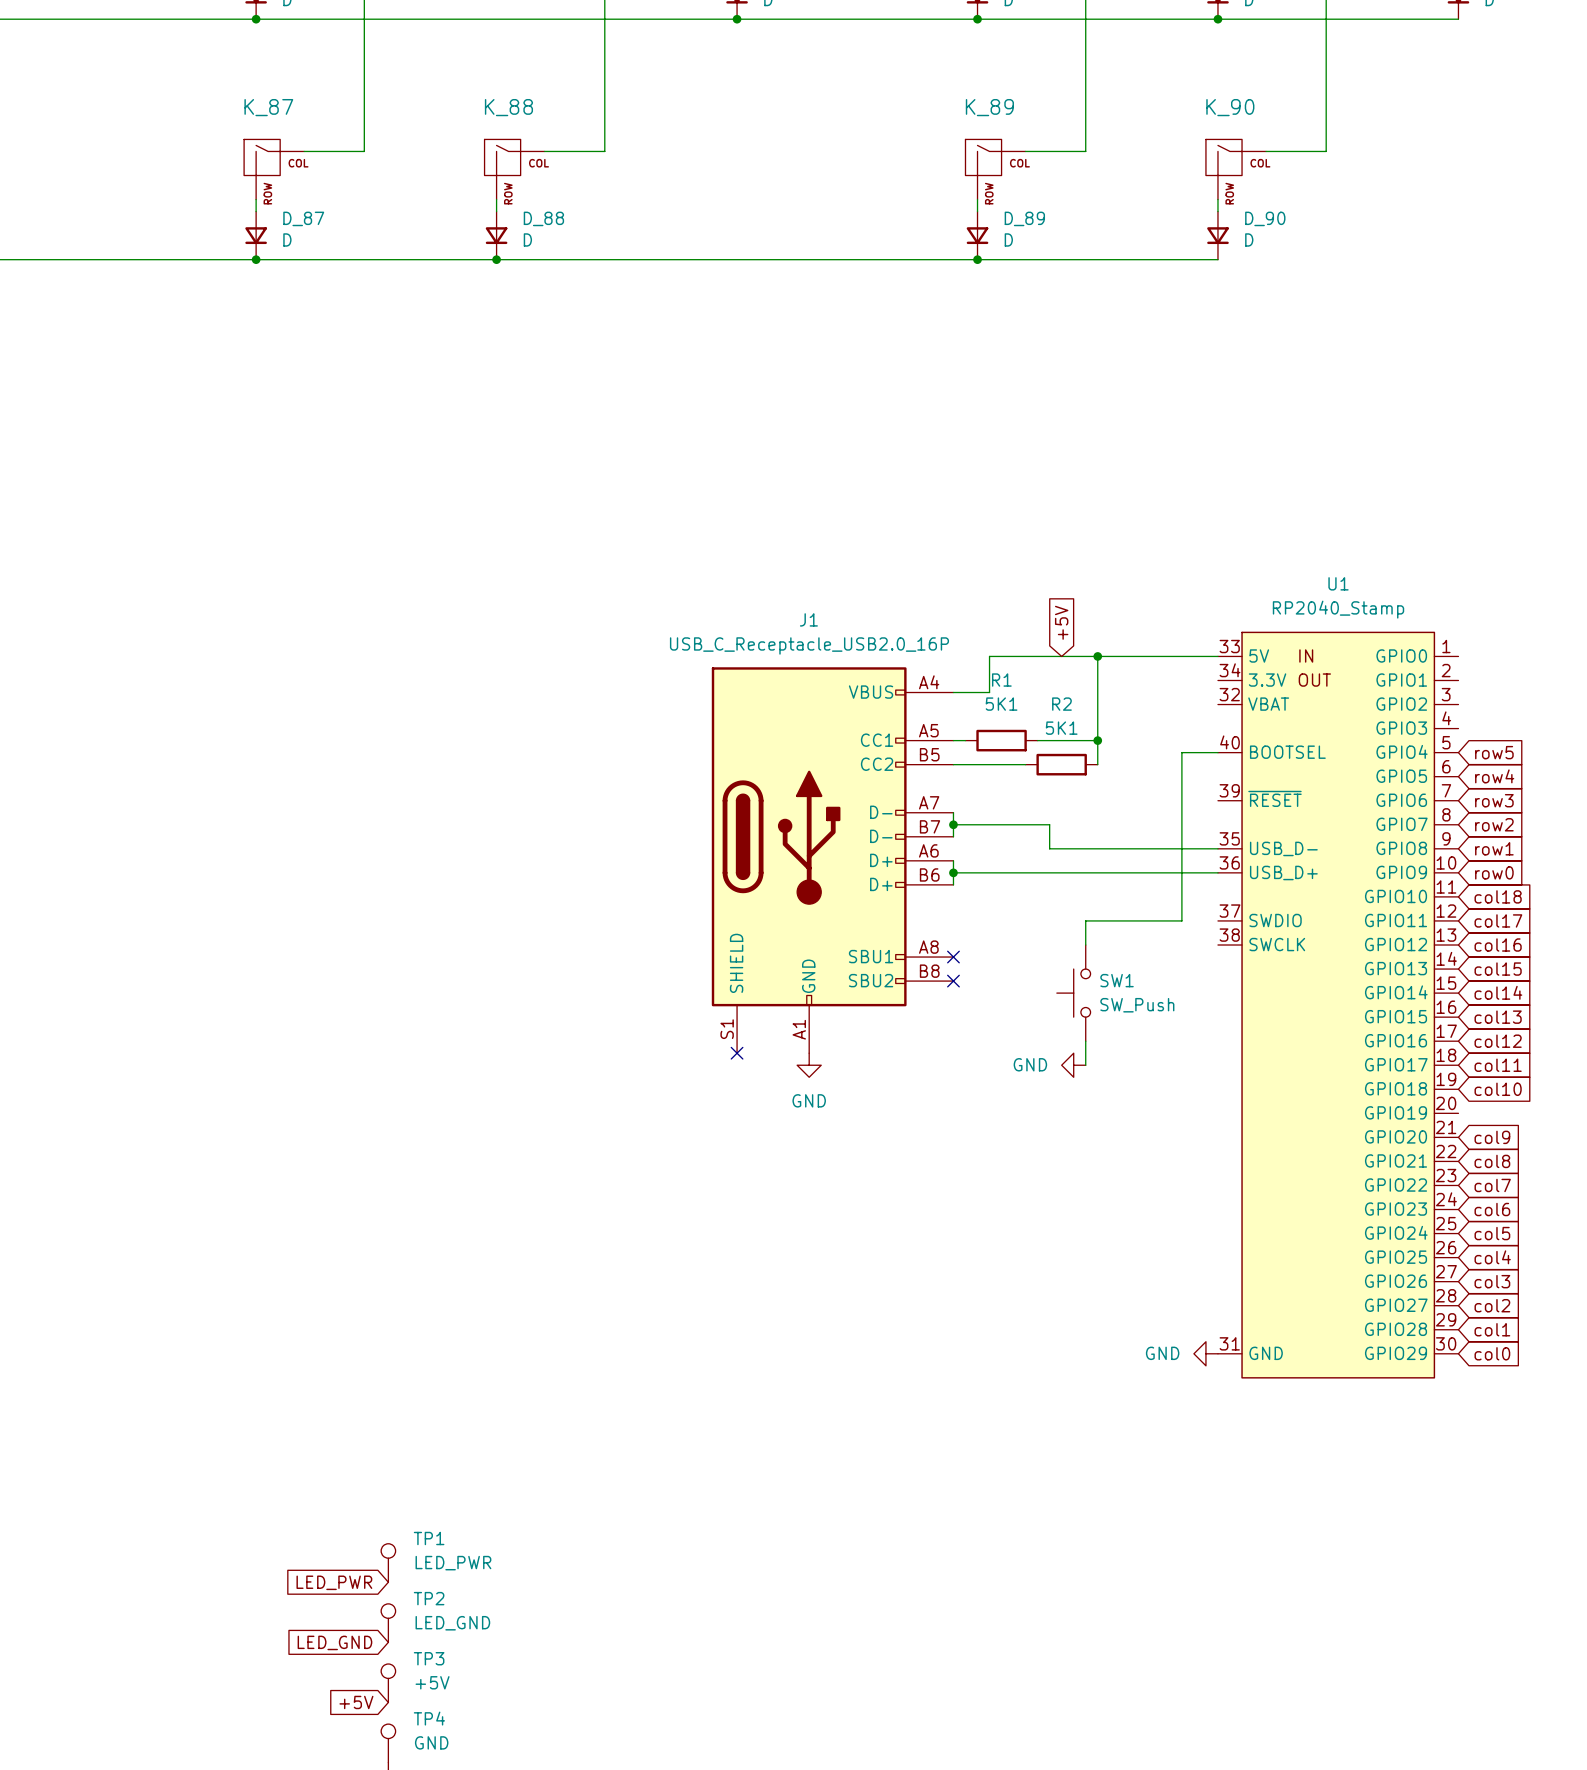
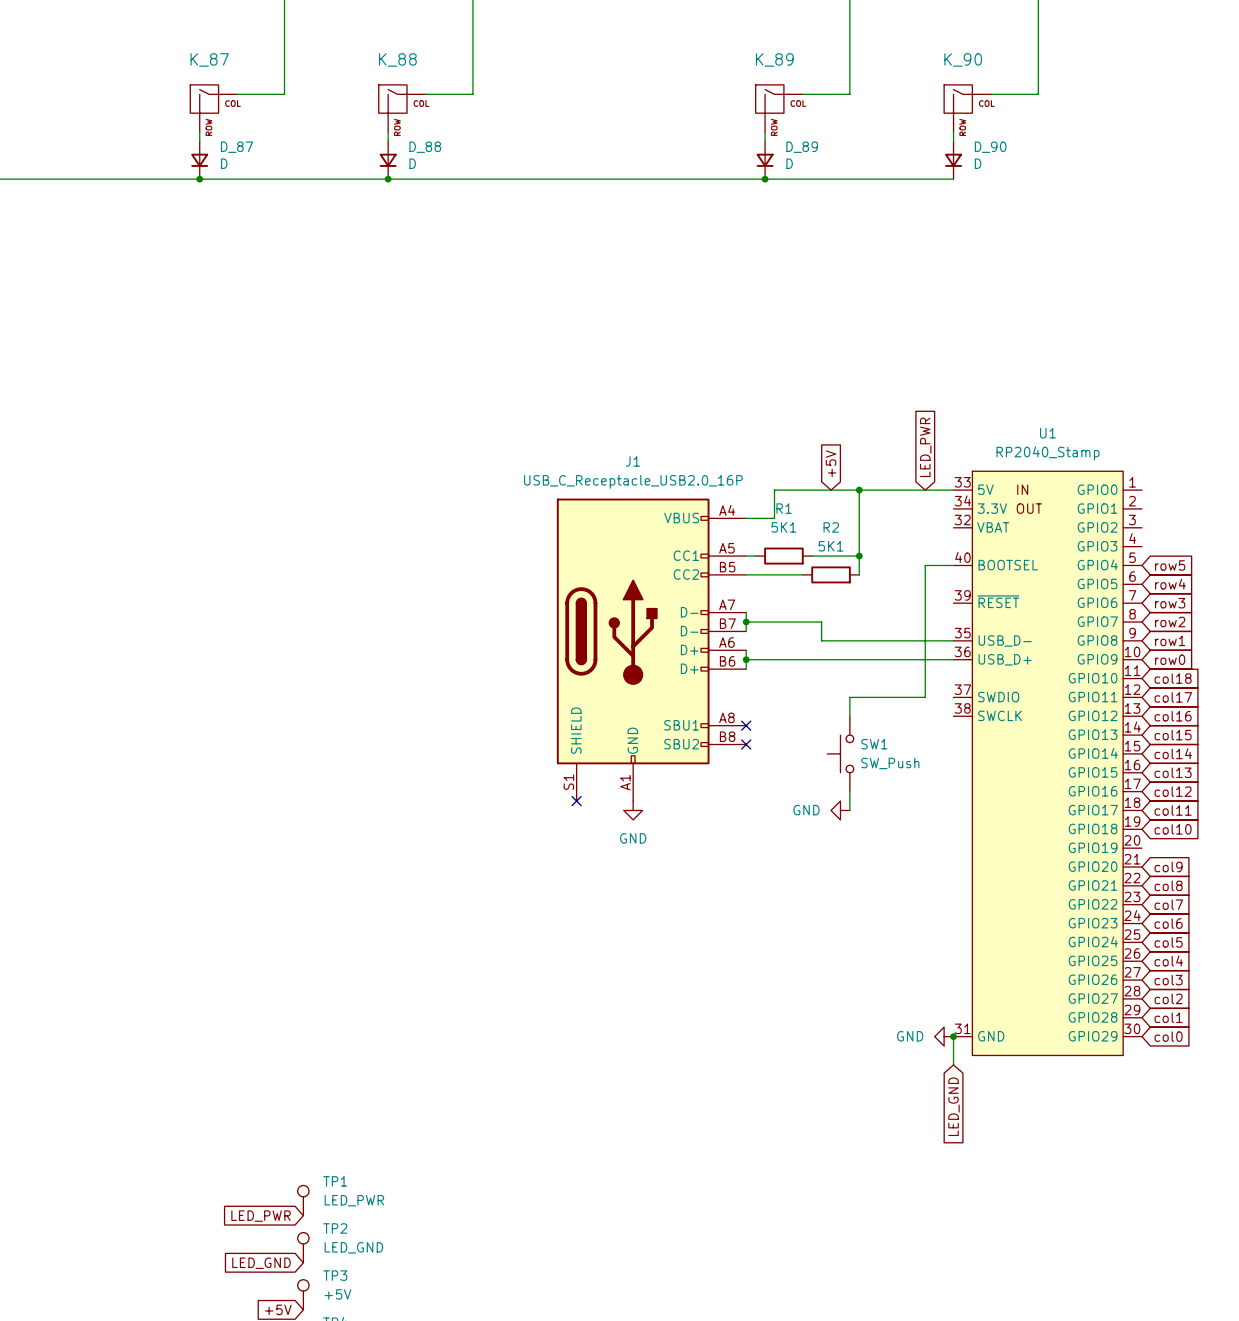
global label: none -> LED_PWR (925, 447)
wire: none -> (953, 1036) (953, 1064)
junction: none -> (953, 1036)
global label: none -> LED_GND (953, 1106)

